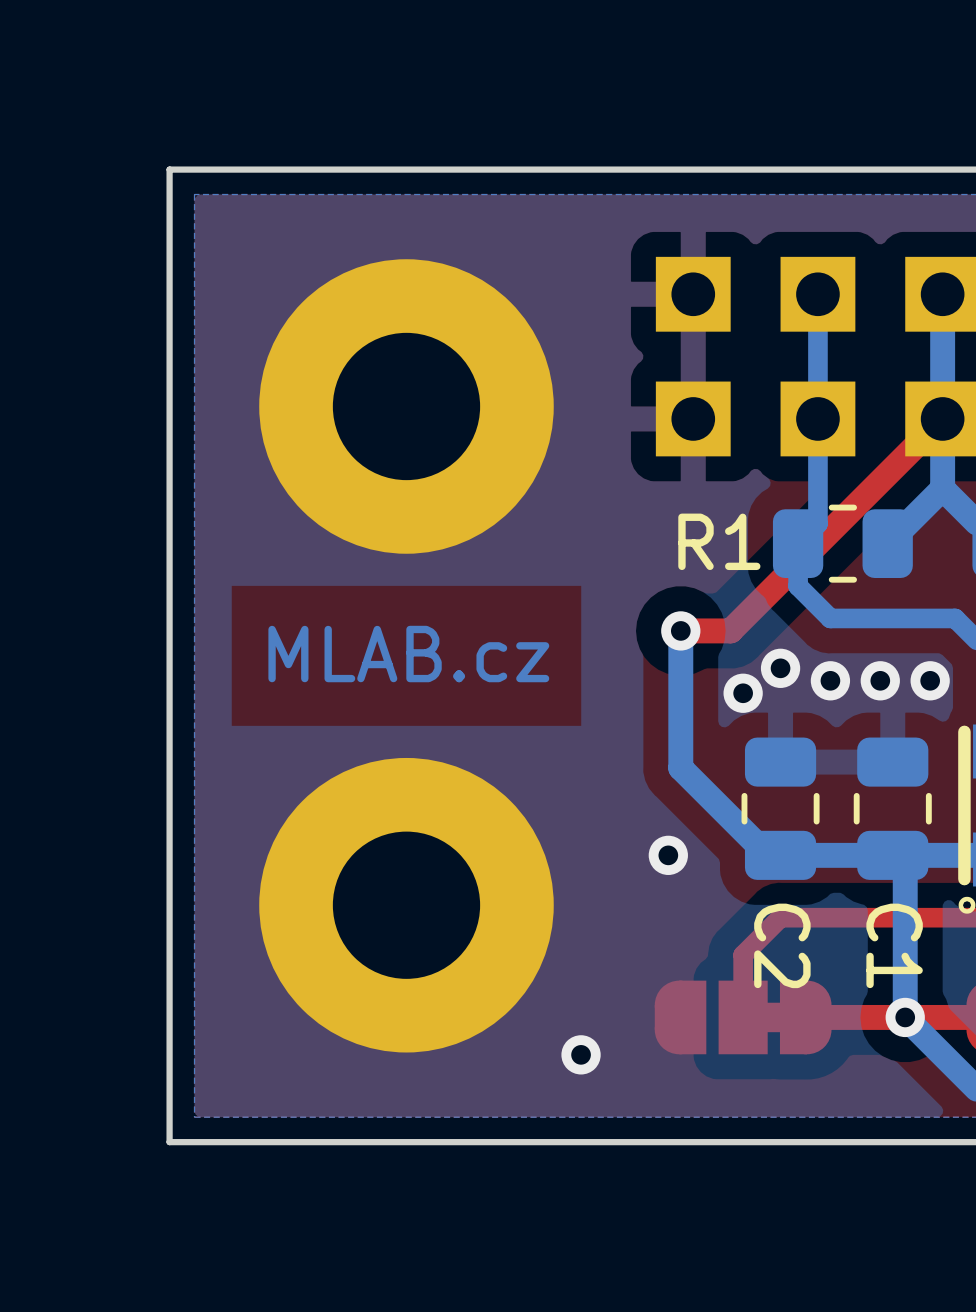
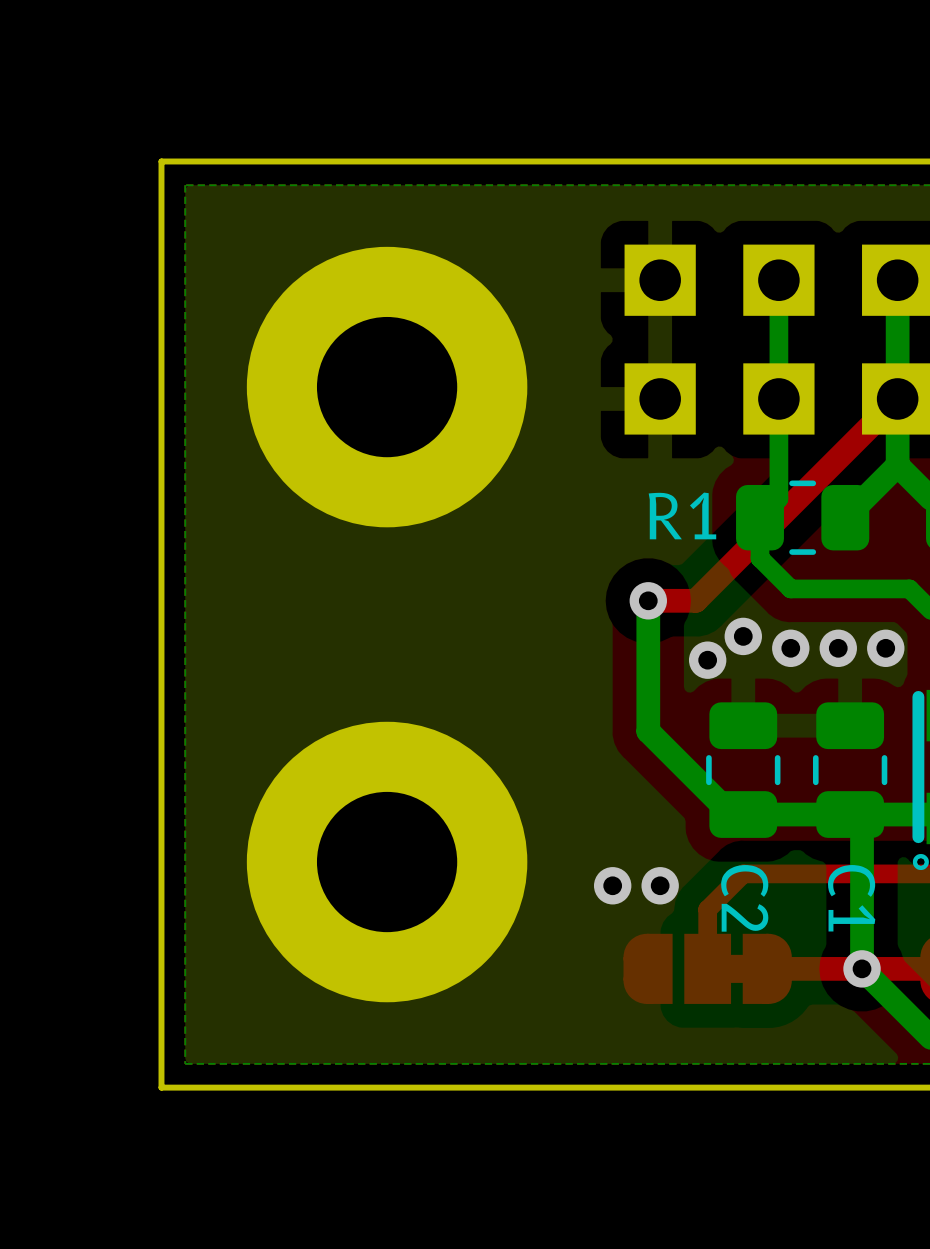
text: MLAB.cz (408, 654) -> none
via: (668, 855) -> none
via: none -> (612, 885)
via: none -> (660, 885)
via: (581, 1054) -> none

